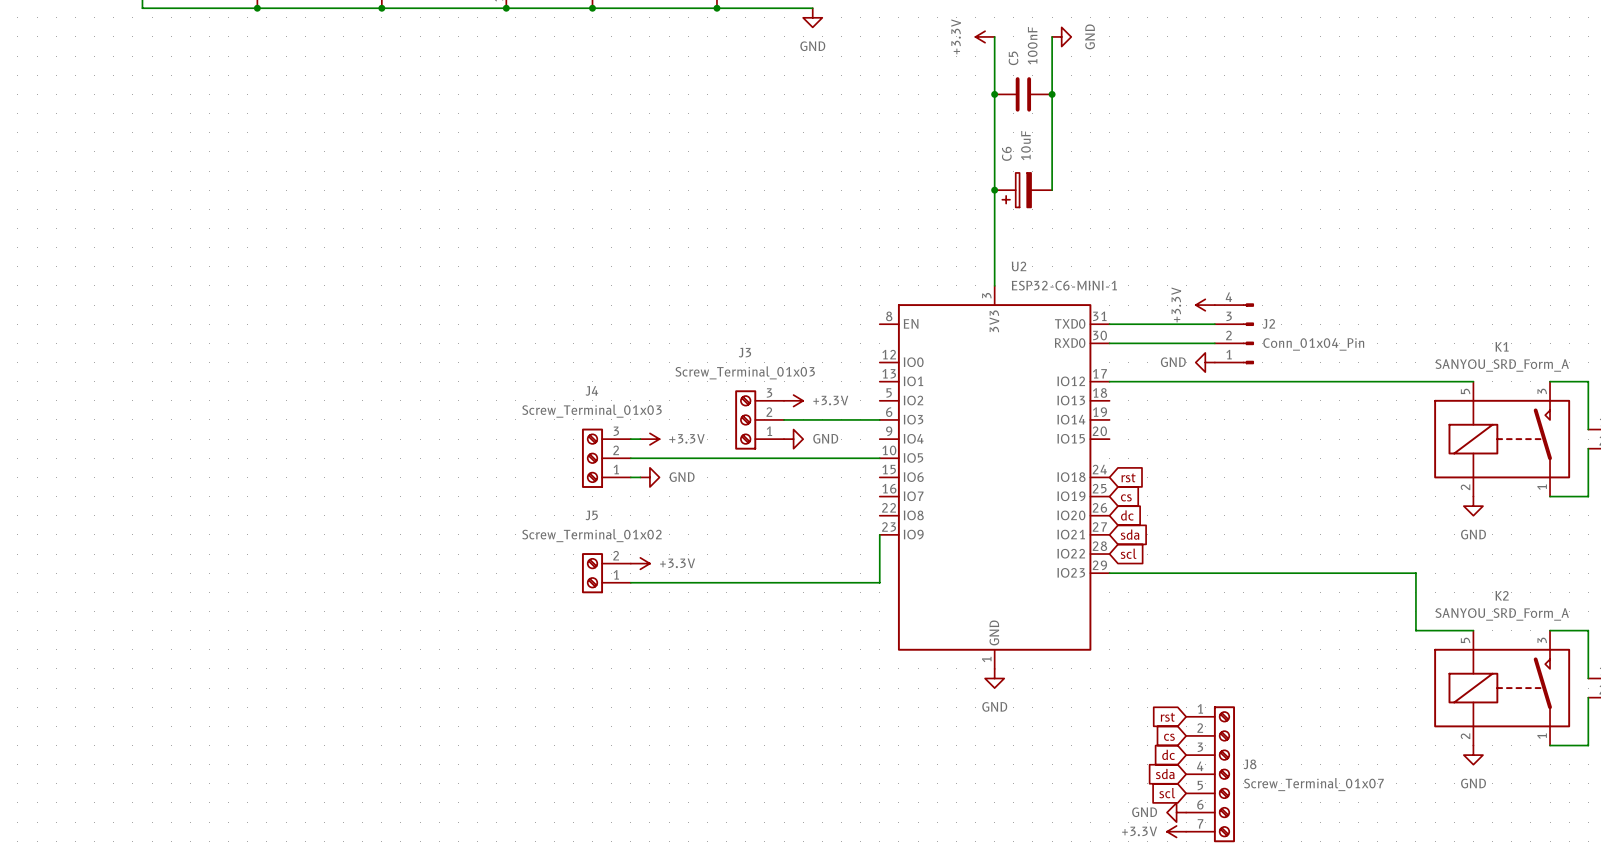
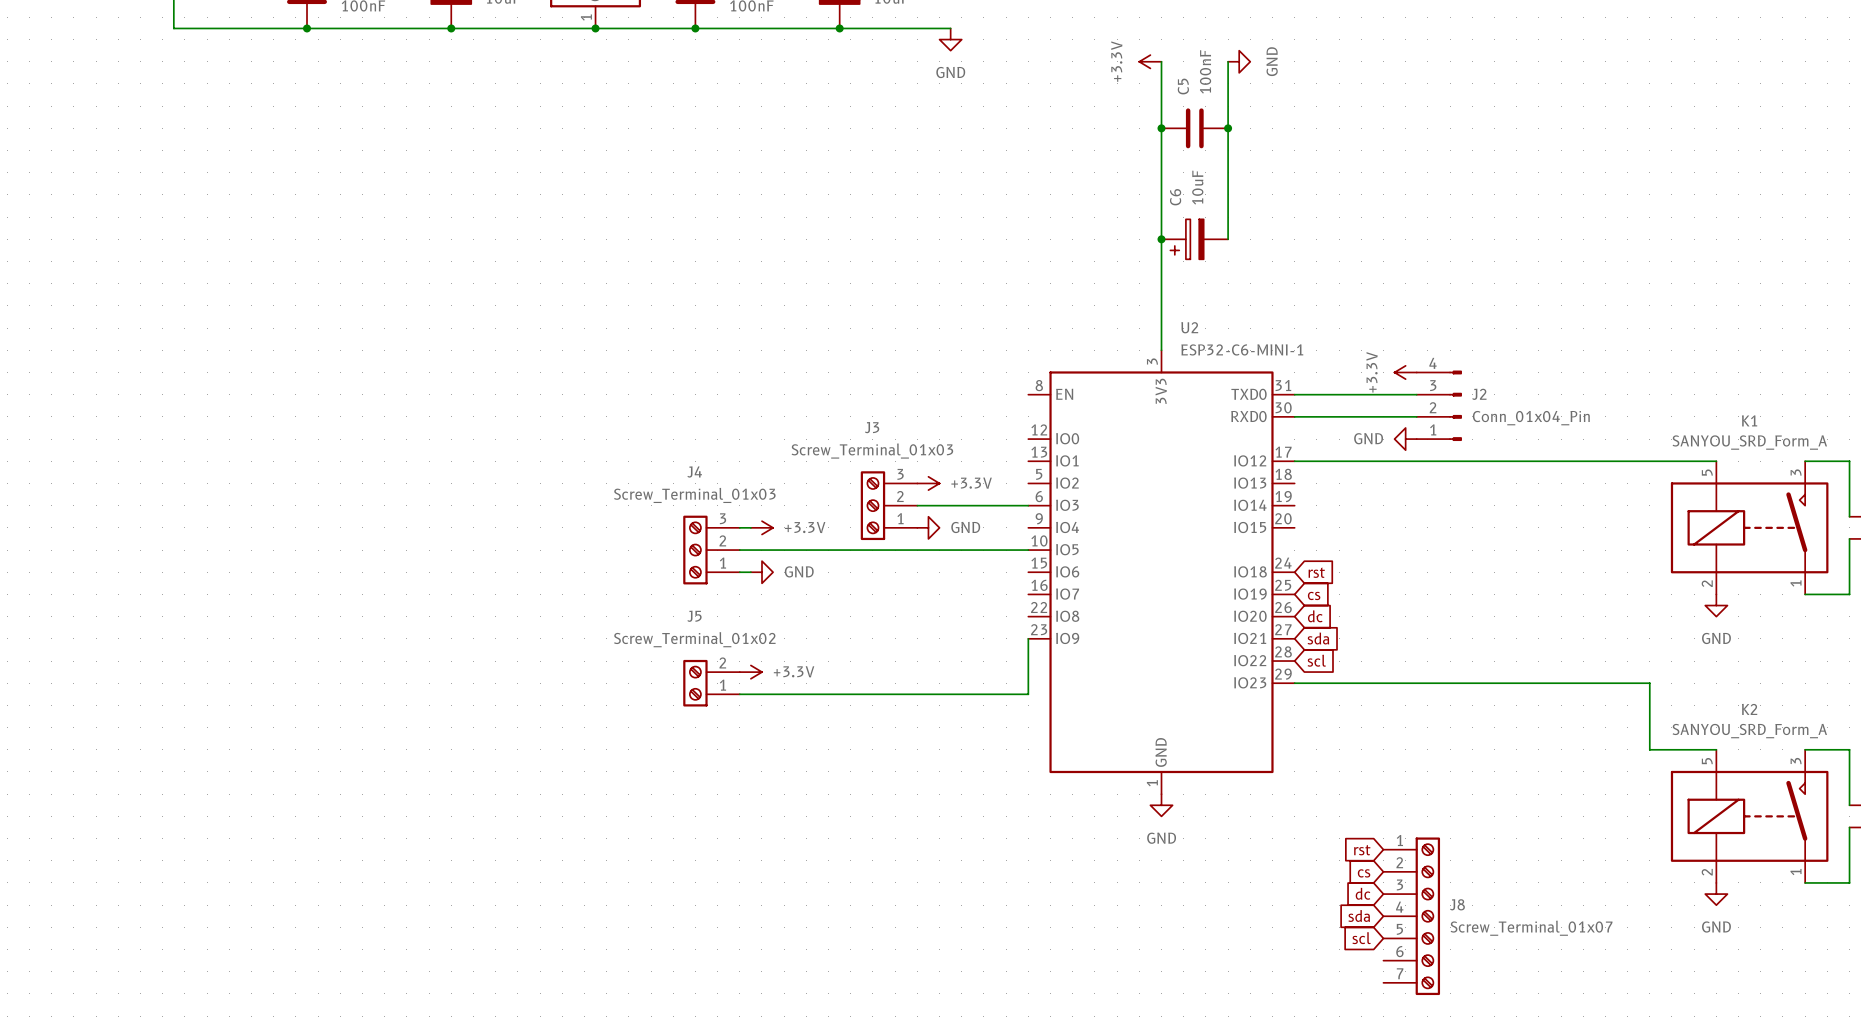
power symbol: GND (1176, 812) -> none
power symbol: +3.3V (1176, 831) -> none

